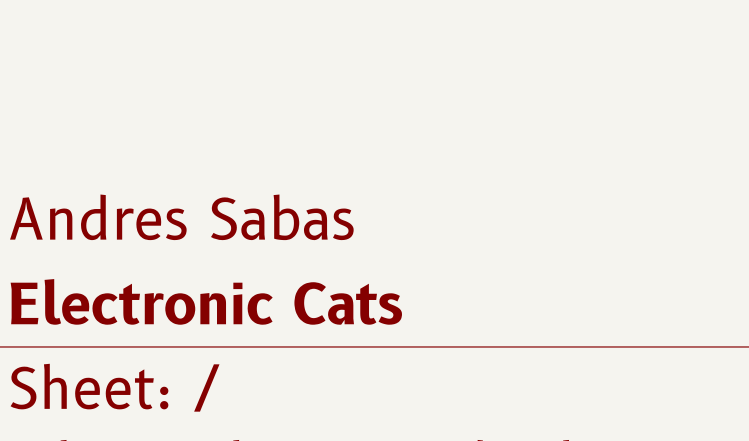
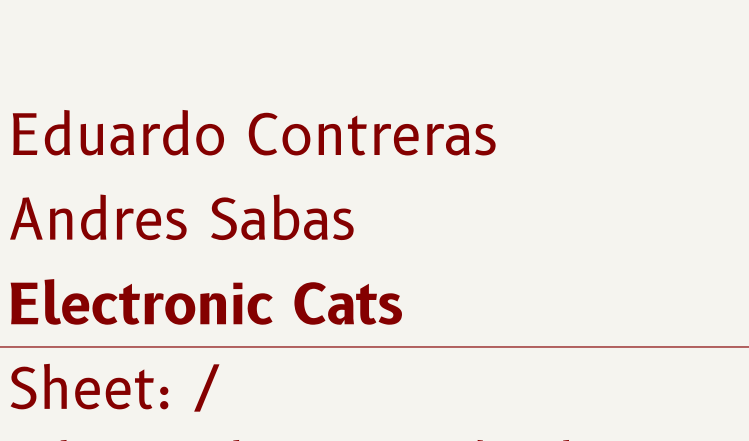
title block: none -> Eduardo Contreras (254, 132)

